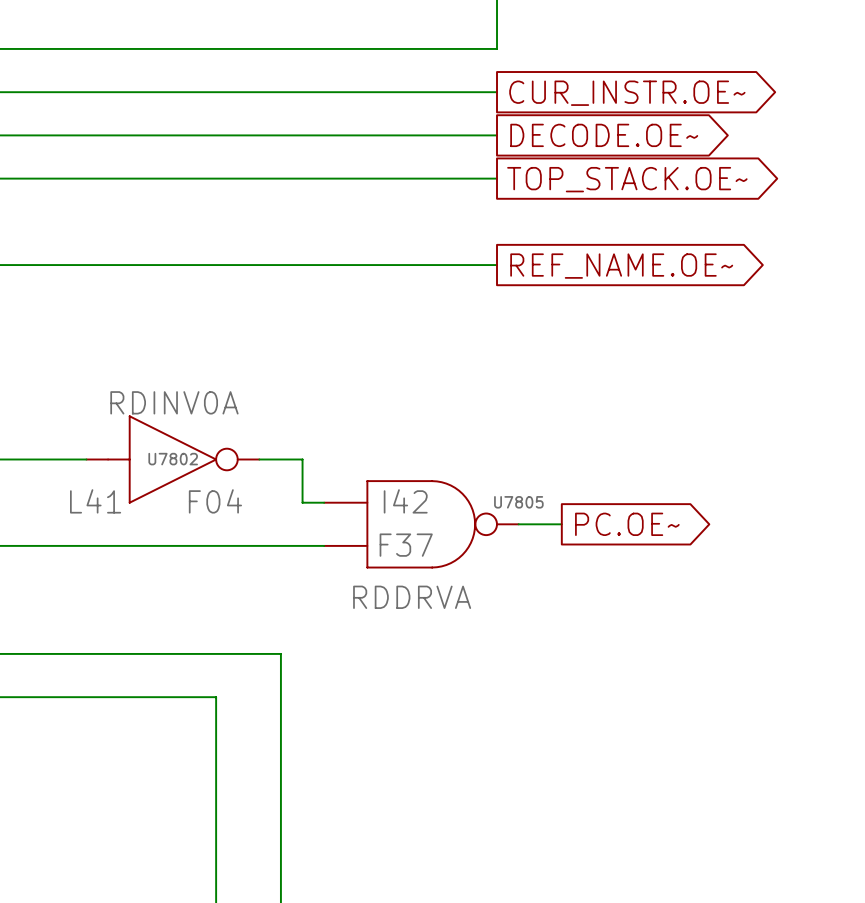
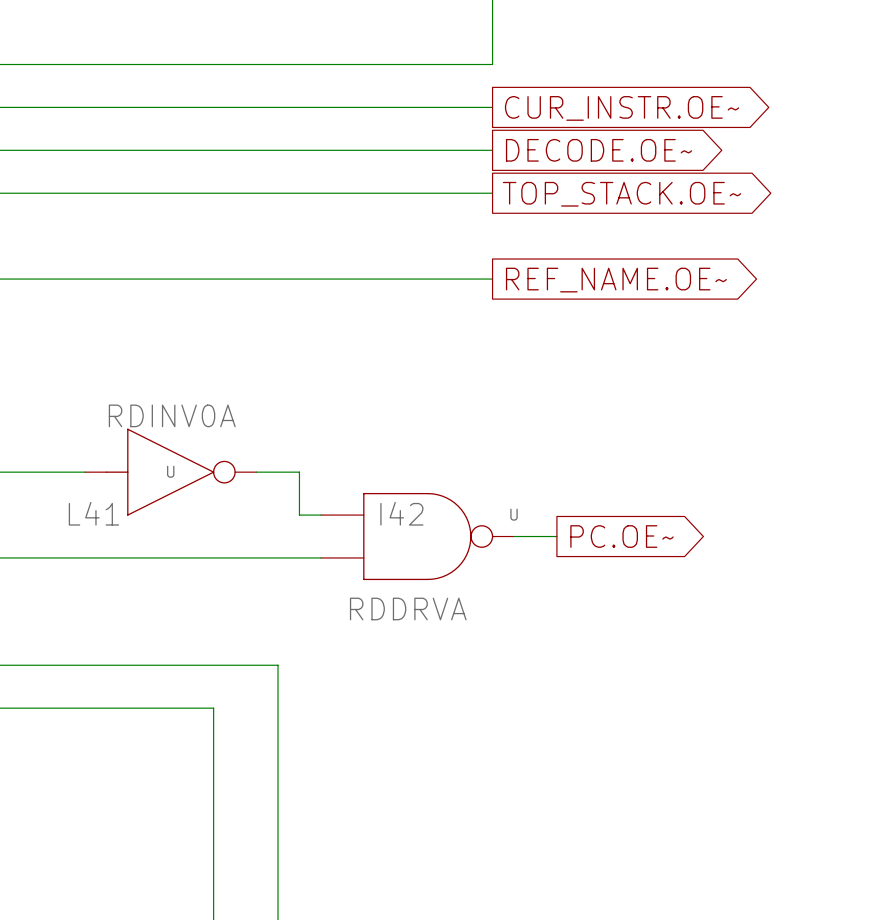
U7802 name: U7802 (173, 459) -> U (170, 471)
U7802 value: F04 (215, 501) -> none
U7805 name: U7805 (518, 502) -> U (514, 514)
U7805 value: F37 (406, 545) -> none

